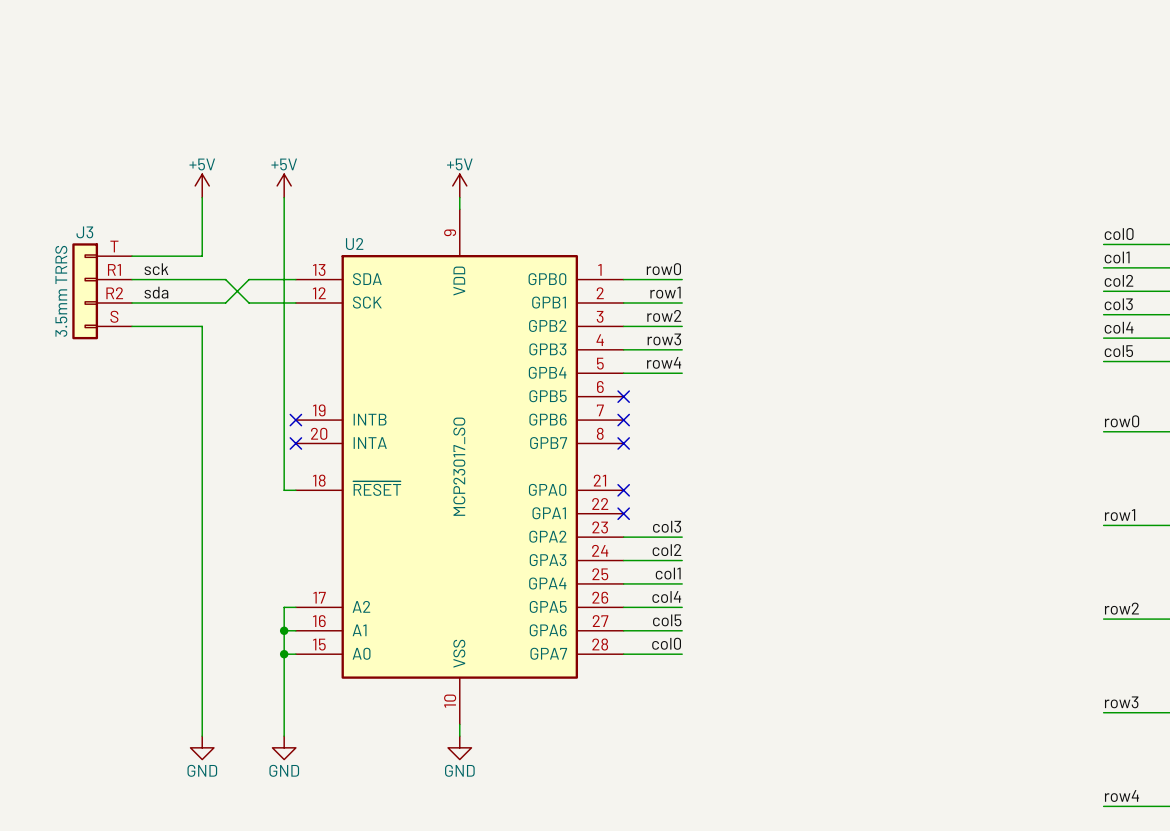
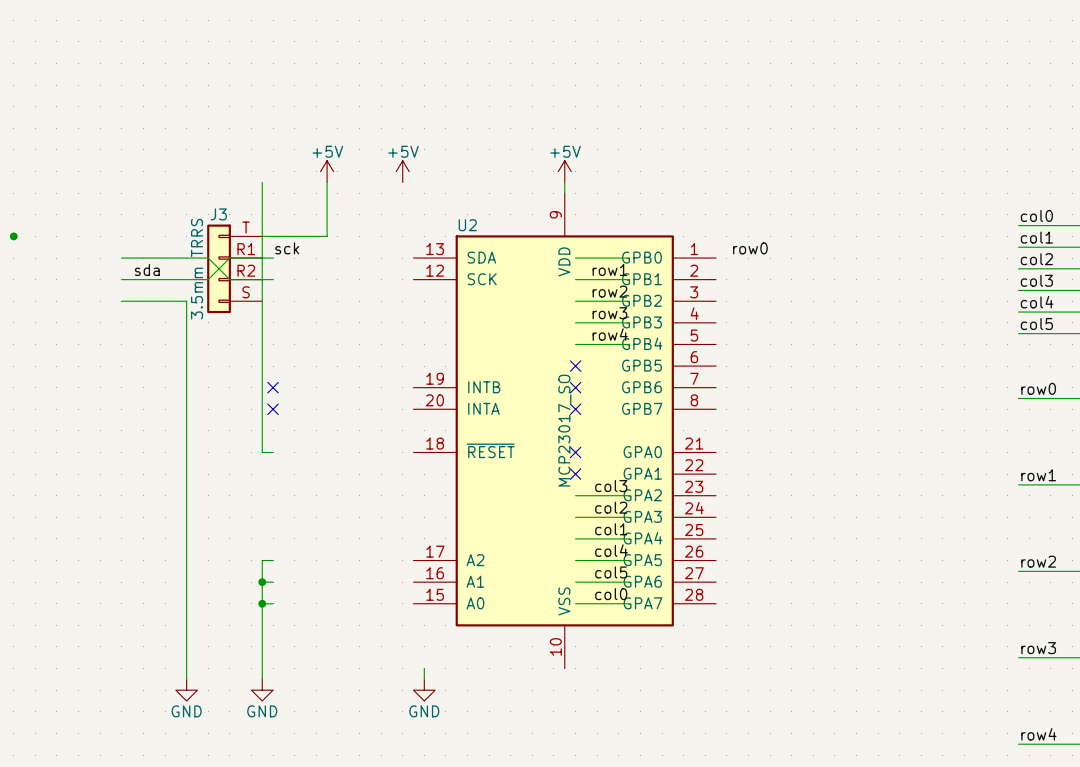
power symbol: +5V (202, 185) -> none
power symbol: +5V (284, 185) -> none
power symbol: none -> +5V (327, 171)
power symbol position: +5V (459, 185) -> +5V (402, 171)
power symbol: none -> +5V (564, 171)
wire: (202, 197) (202, 256) (131, 256) -> (327, 182) (327, 236) (262, 236)
wire: (459, 197) (459, 209) -> (564, 182) (564, 193)
junction: none -> (13, 236)
label: sck (156, 269) -> none
label: none -> sck (287, 248)
label position: row0 (663, 269) -> row0 (750, 248)
J3 position: (102, 291) -> (234, 268)
U2 position: (459, 466) -> (564, 430)

